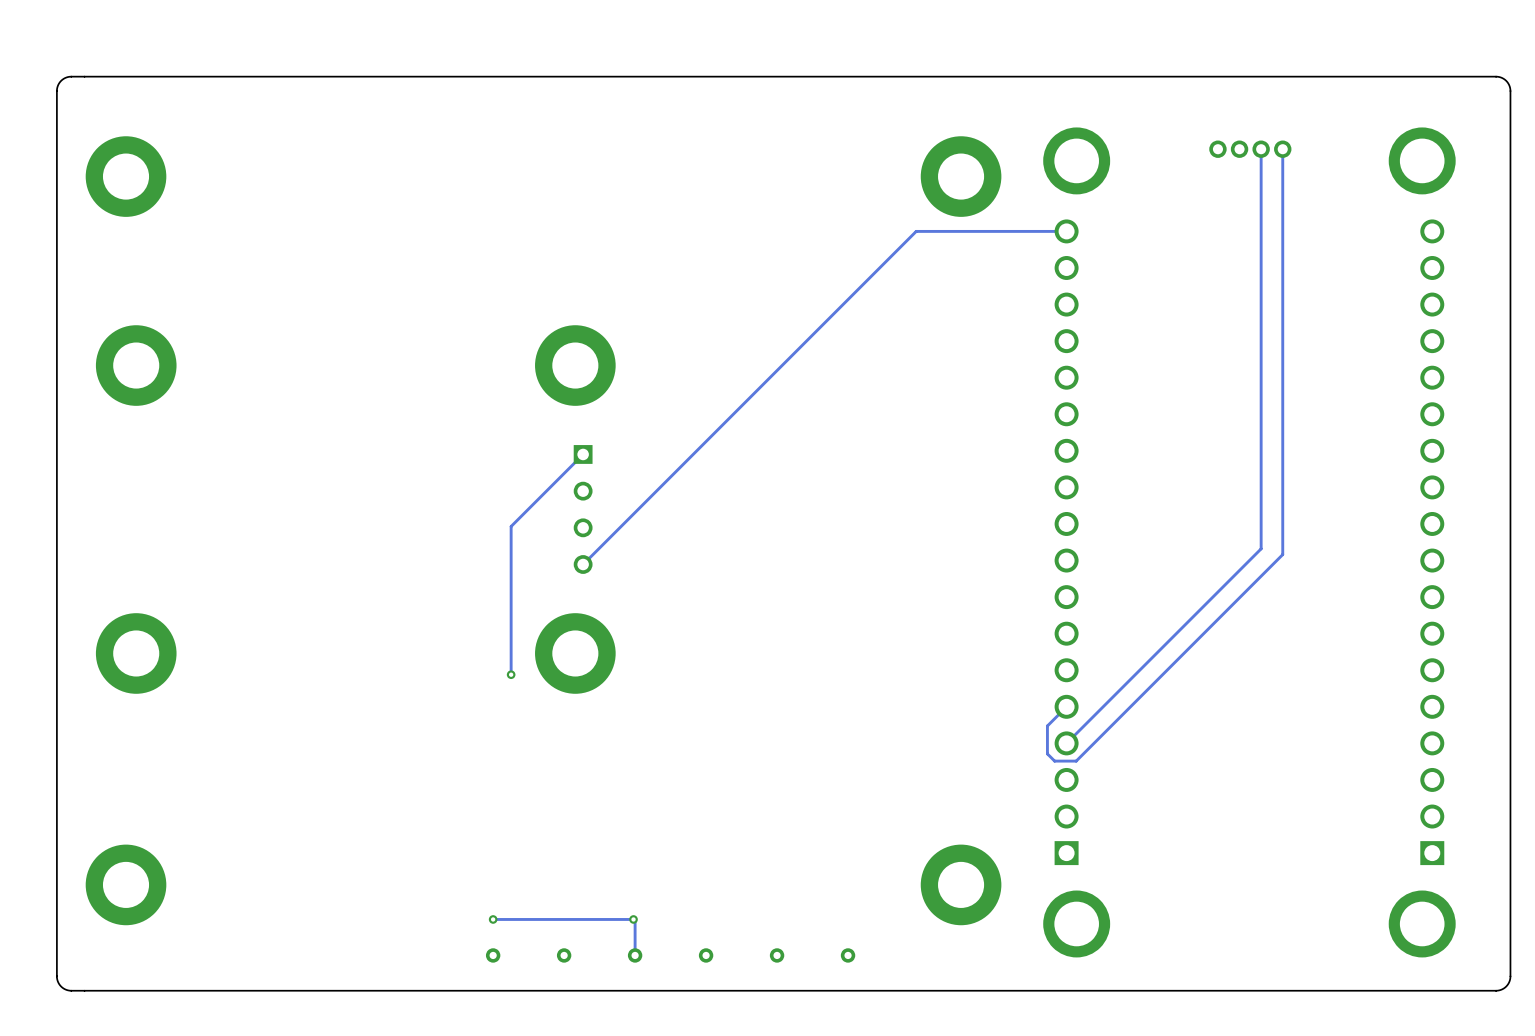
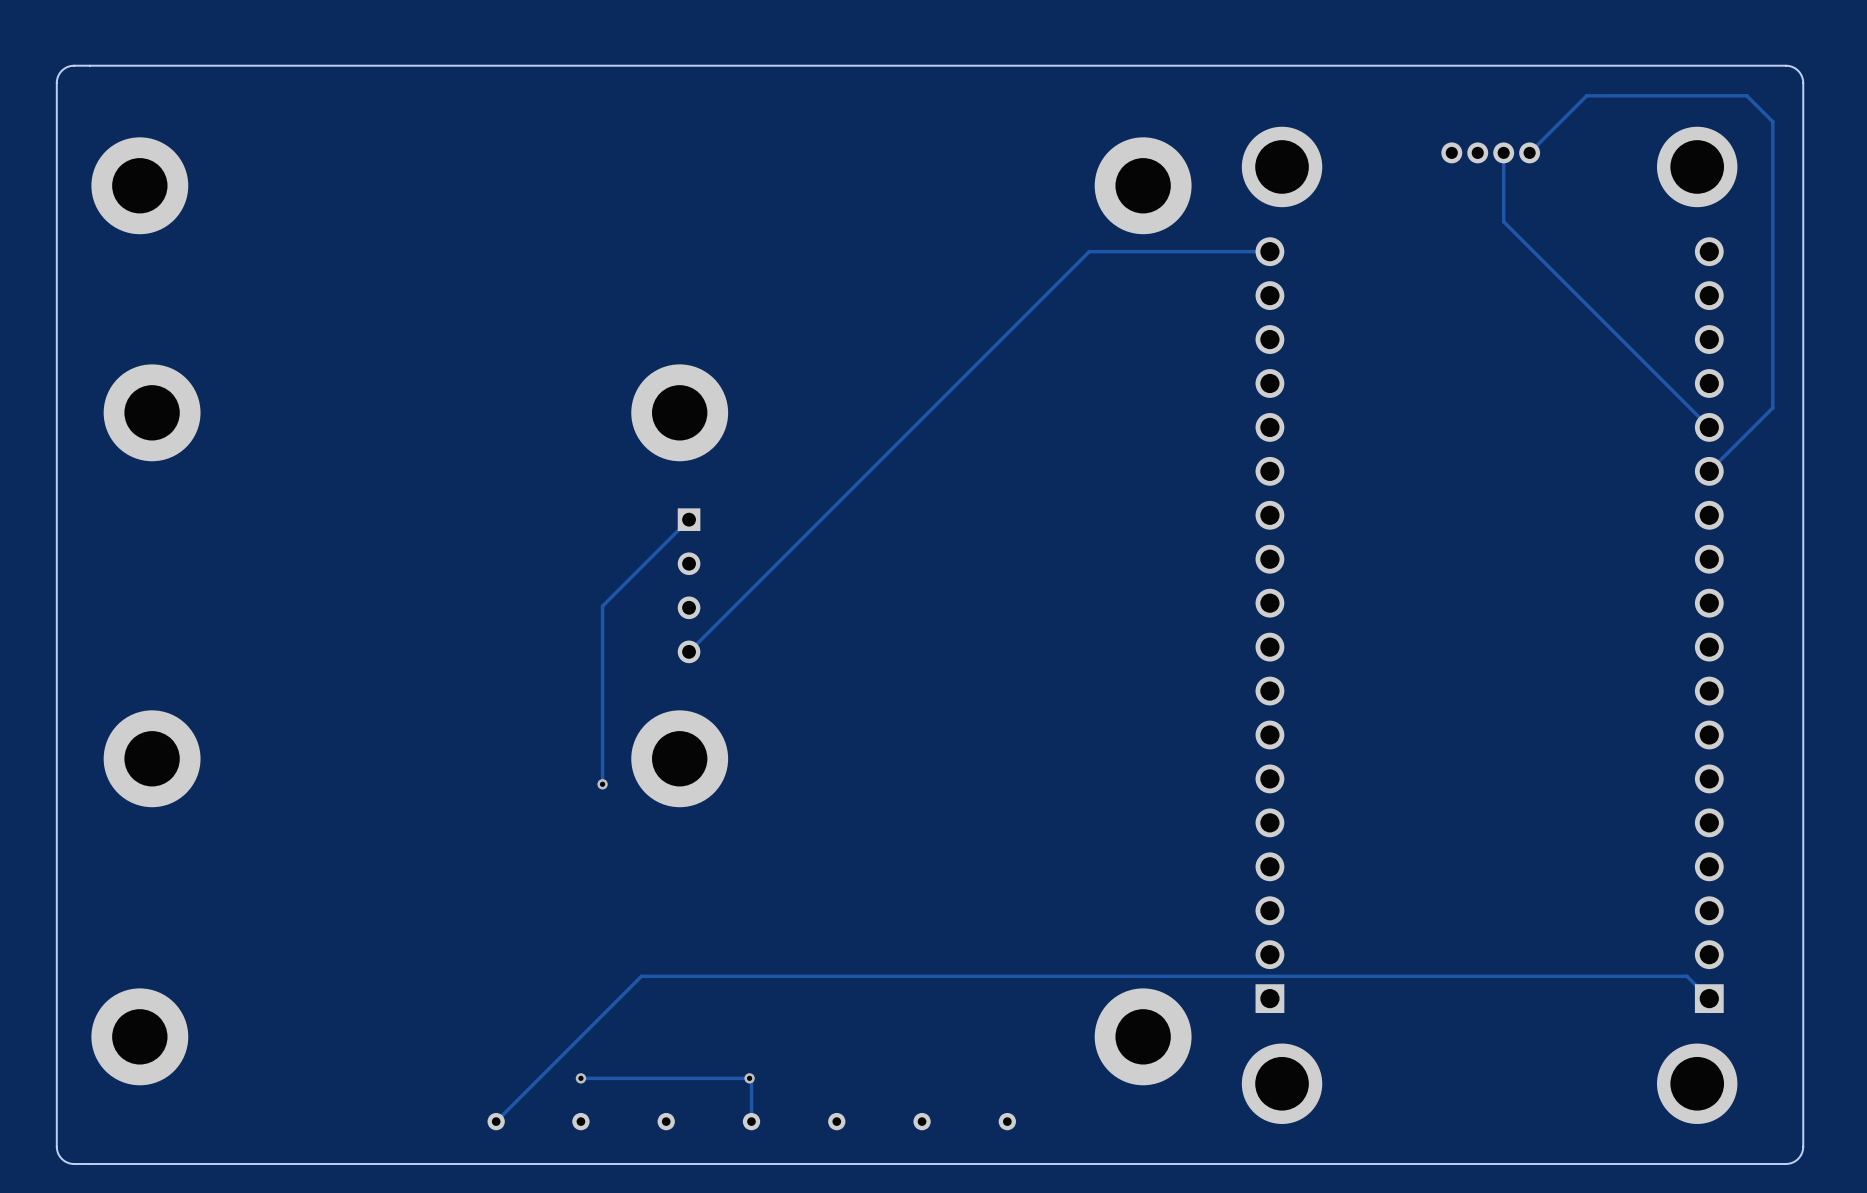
track: (1282, 149) (1282, 554) (1076, 761) (1054, 761) (1047, 753) (1047, 725) (1066, 706) -> (1529, 152) (1586, 95) (1746, 95) (1772, 121) (1772, 407) (1709, 471)
track: (1261, 206) (1261, 548) (1066, 743) -> (1503, 221) (1709, 427)
track: none -> (1709, 998) (1686, 976) (641, 976) (496, 1121)
part: none -> (496, 1121)

